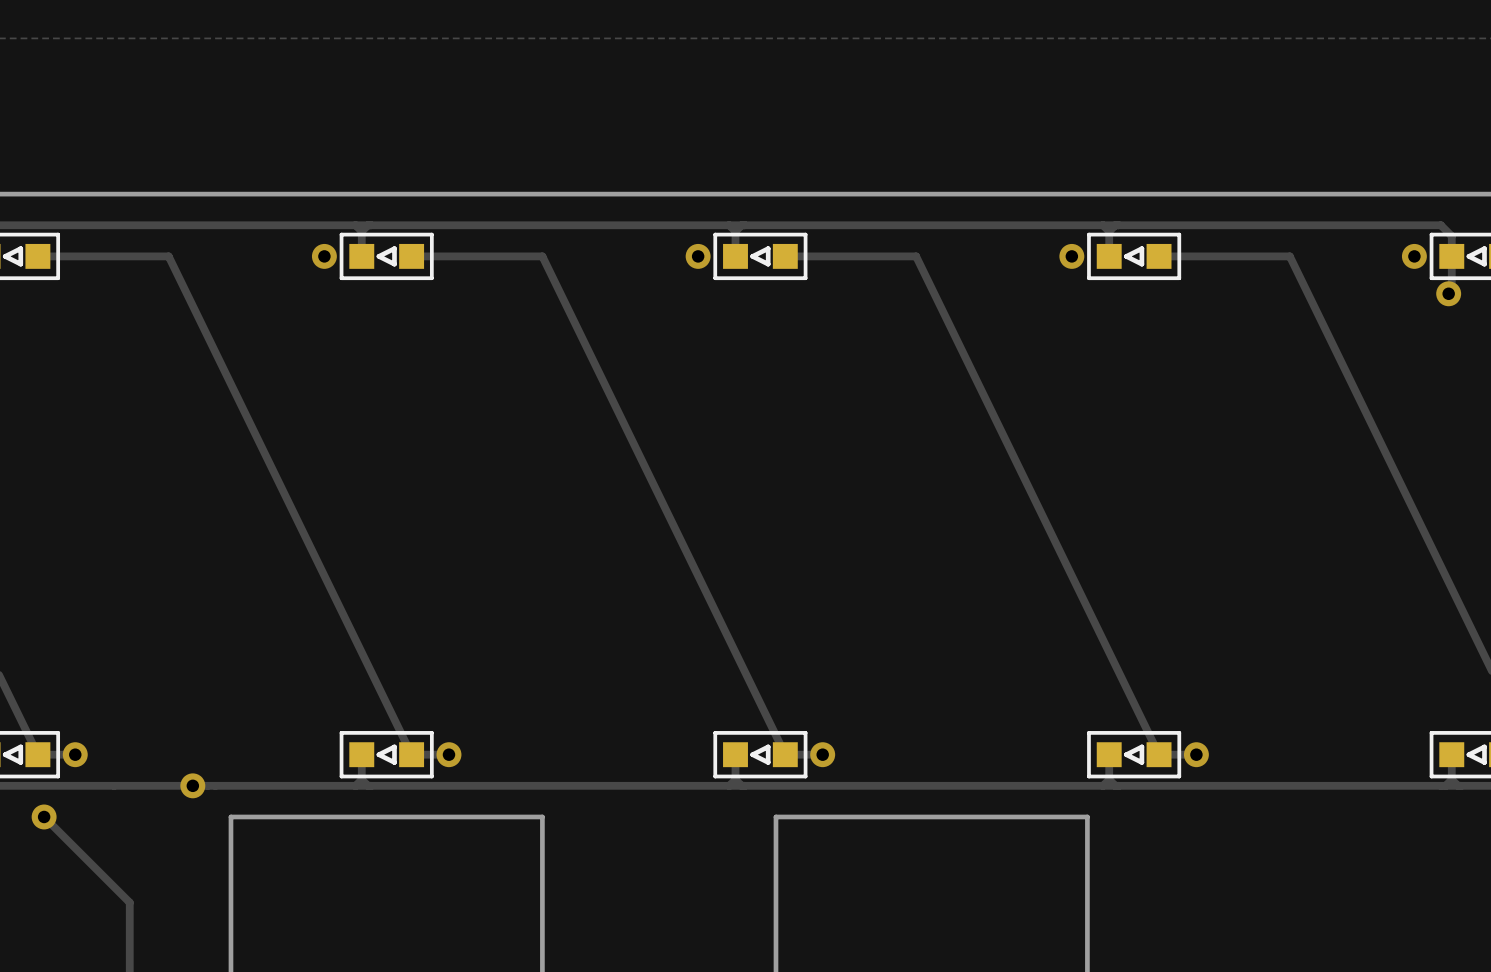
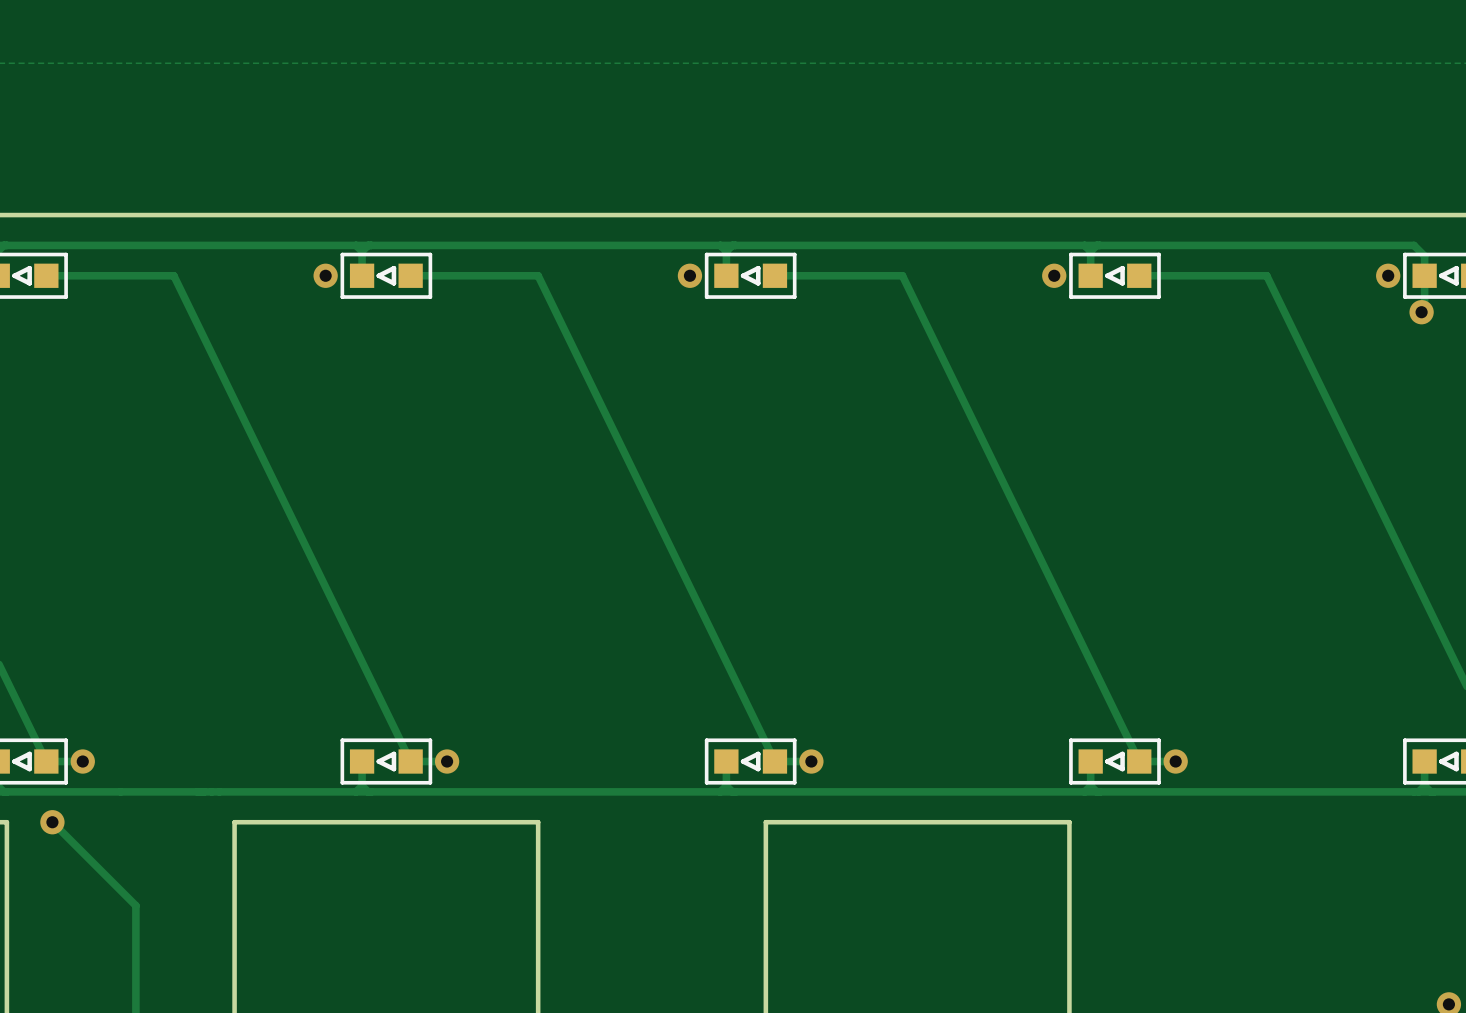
via: (192, 785) -> none

